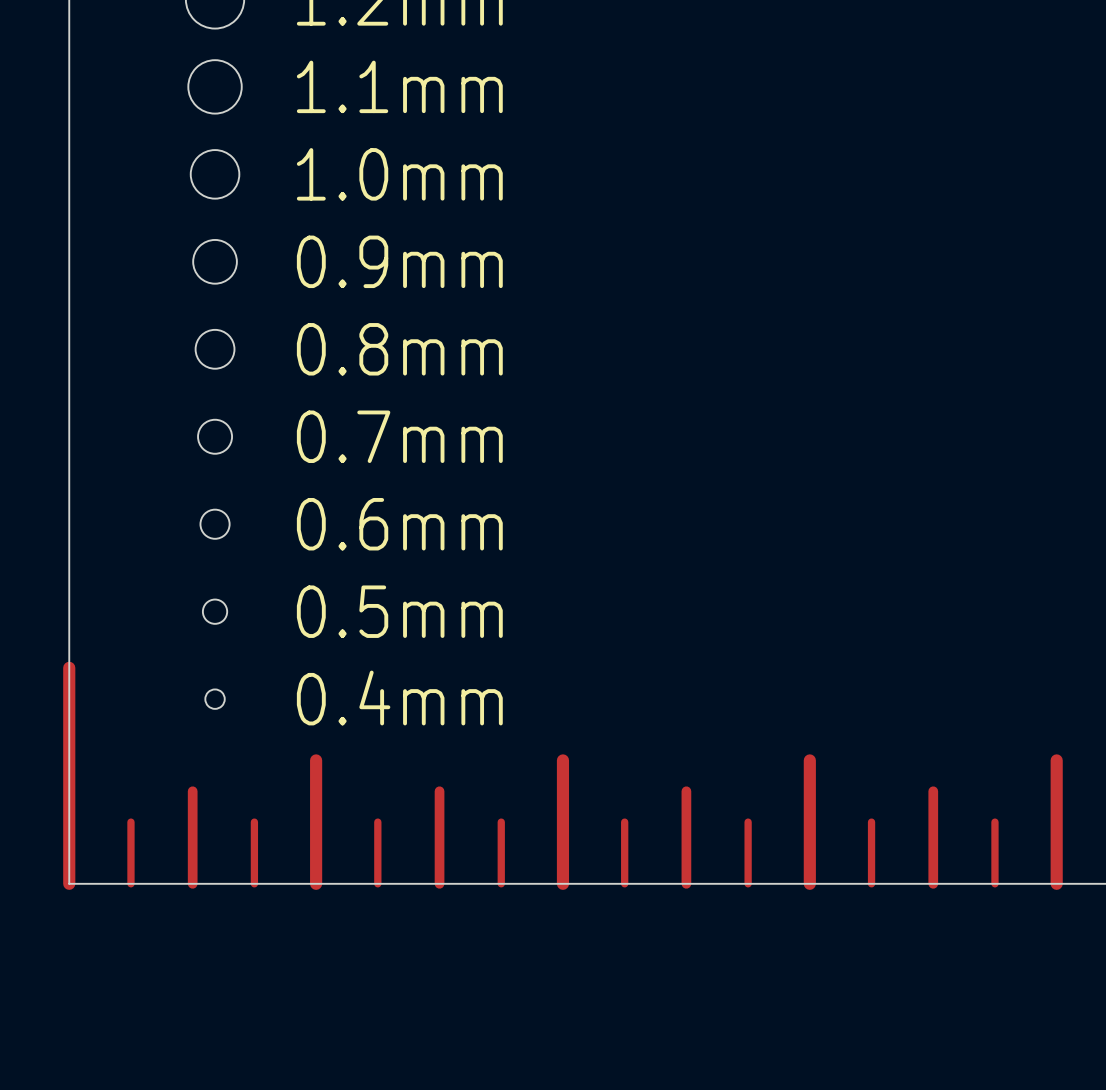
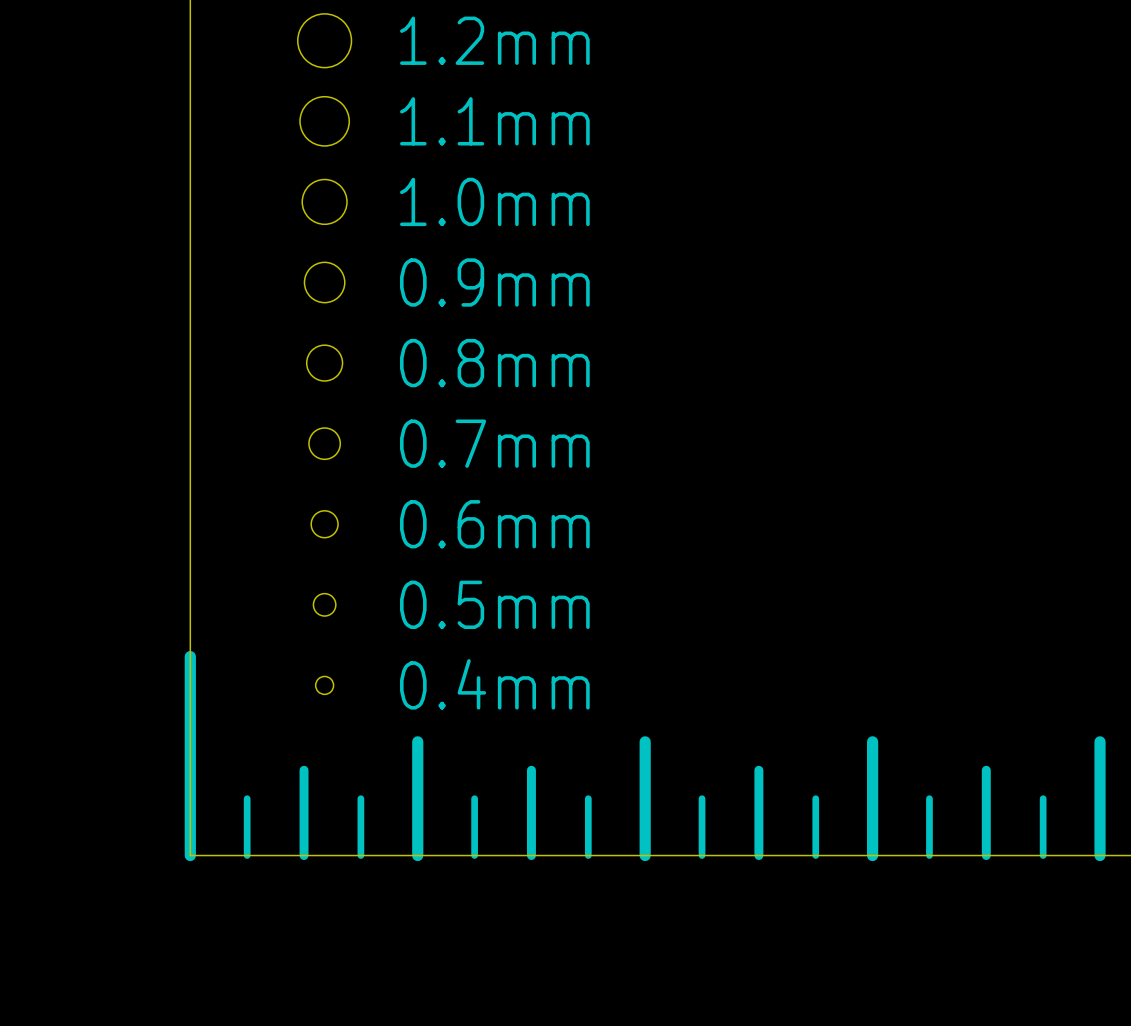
track: (69, 667) (69, 883) -> none
line: none -> (190, 656) (190, 855)
track: (316, 760) (316, 883) -> none
line: none -> (417, 741) (417, 855)
track: (562, 760) (562, 883) -> none
line: none -> (645, 741) (645, 855)
track: (809, 760) (809, 883) -> none
line: none -> (872, 741) (872, 855)
track: (1056, 760) (1056, 883) -> none
line: none -> (1100, 741) (1100, 855)
track: (192, 791) (192, 883) -> none
line: none -> (304, 770) (304, 855)
track: (439, 791) (439, 883) -> none
line: none -> (531, 770) (531, 855)
track: (686, 791) (686, 883) -> none
line: none -> (758, 770) (758, 855)
track: (933, 791) (933, 883) -> none
line: none -> (986, 770) (986, 855)
track: (130, 822) (130, 883) -> none
line: none -> (247, 798) (247, 855)
track: (254, 822) (254, 883) -> none
line: none -> (360, 798) (360, 855)
track: (377, 822) (377, 883) -> none
line: none -> (474, 798) (474, 855)
track: (501, 822) (501, 883) -> none
line: none -> (588, 798) (588, 855)
track: (624, 822) (624, 883) -> none
line: none -> (702, 798) (702, 855)
track: (748, 822) (748, 883) -> none
line: none -> (815, 798) (815, 855)
track: (871, 822) (871, 883) -> none
line: none -> (929, 798) (929, 855)
track: (994, 822) (994, 883) -> none
line: none -> (1043, 798) (1043, 855)

